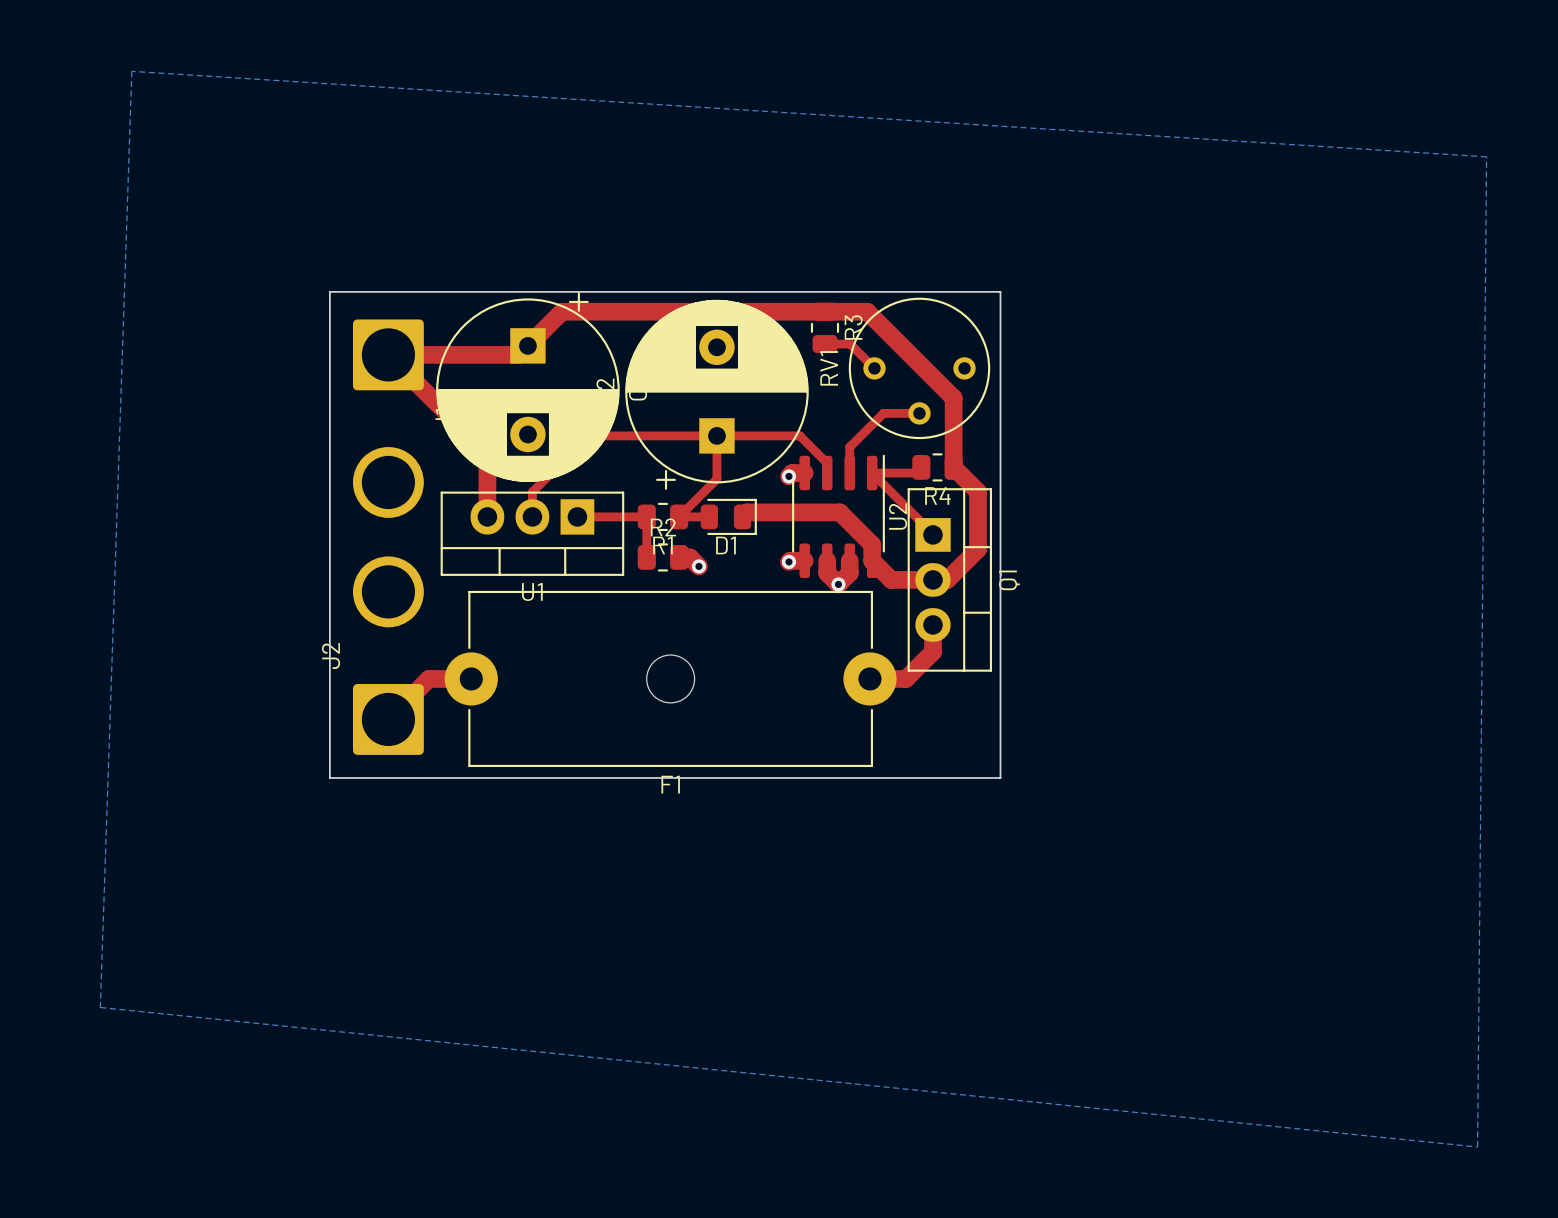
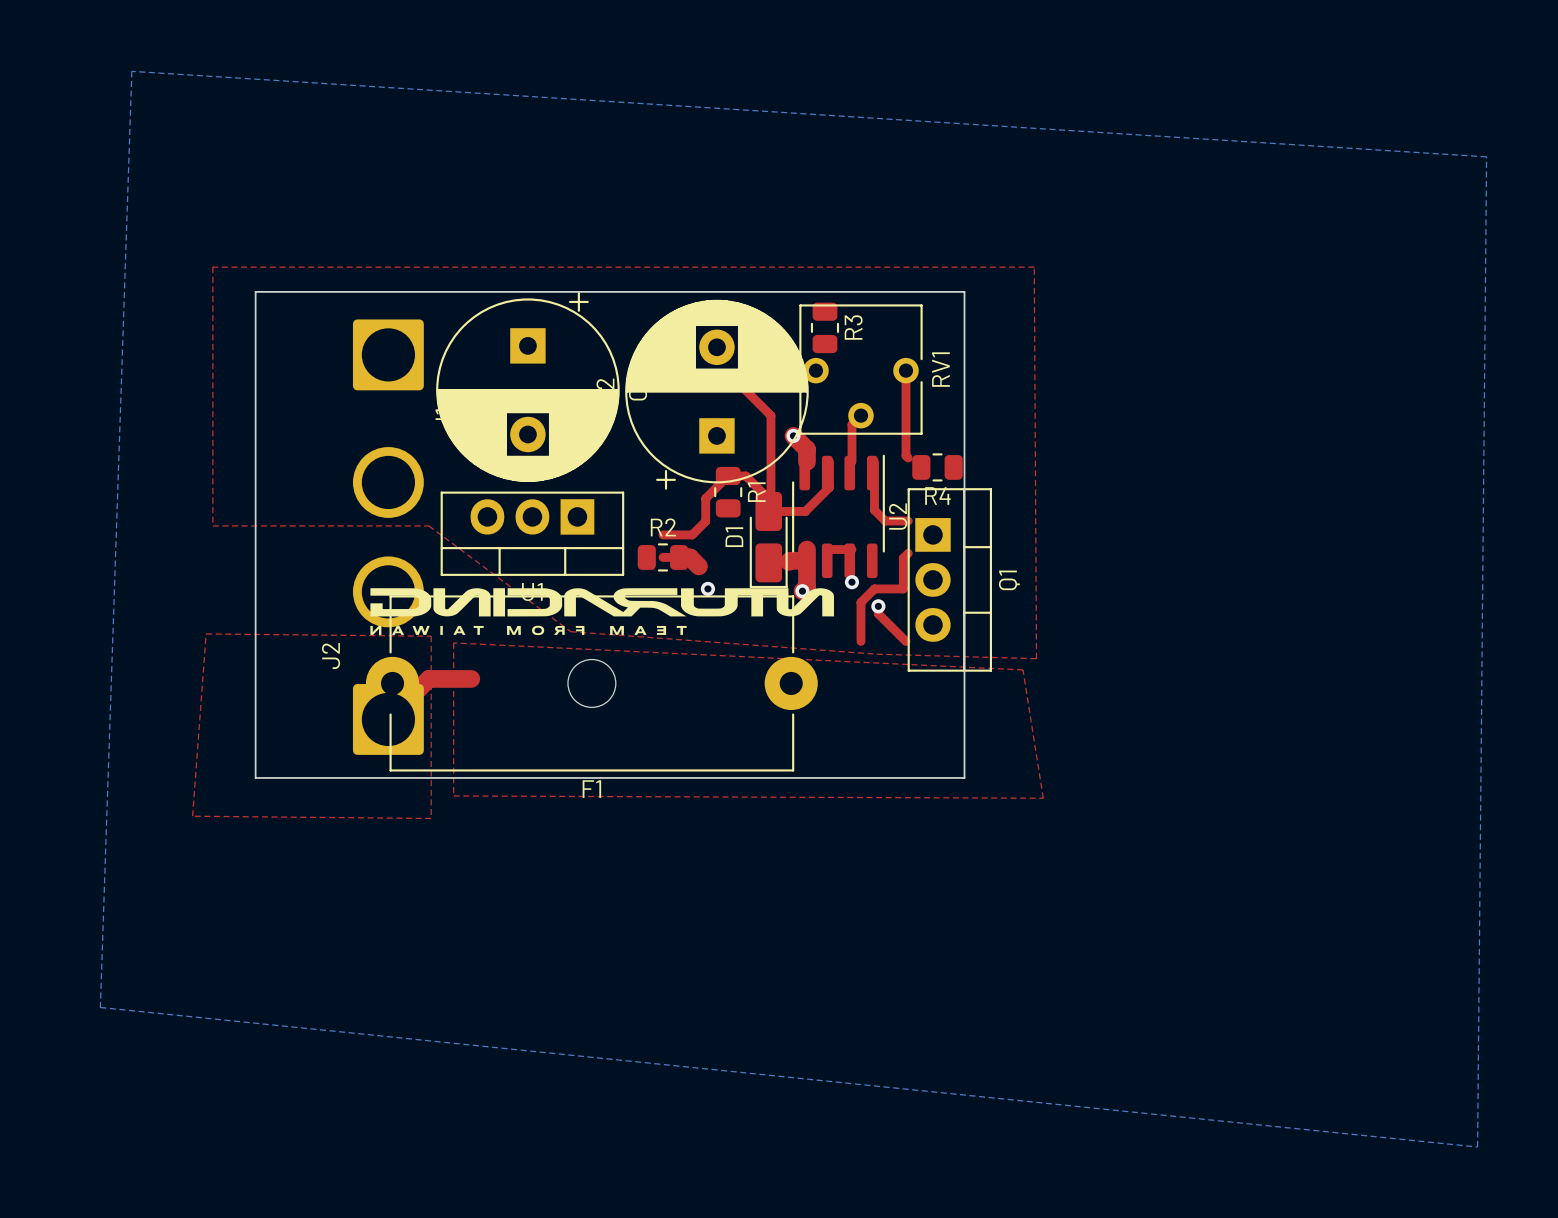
top zone outline: none -> (212, 267) (1034, 267) (1036, 658) (876, 654) (570, 631) (428, 525) (212, 525) (212, 267)
board edge: (329, 291) (329, 777) -> (329, 291) (255, 291) (255, 777) (329, 777)
board edge: (964, 291) (1000, 291) (1000, 777) (964, 777) -> (964, 291) (964, 777)
RV1 footprint: [848, 297, 991, 440] -> [799, 304, 923, 435]
top track: (824, 344) (850, 344) (874, 368) -> none
RV1 name position: RV1 (829, 368) -> RV1 (940, 369)
top track: none -> (905, 370) (905, 455) (908, 457)
top track: none -> (737, 381) (770, 415) (770, 509) (768, 511)
top track: (919, 413) (883, 413) (849, 447) (849, 473) -> none
top track: none -> (860, 415) (851, 424) (851, 461)
top track: (716, 435) (716, 479) (679, 516) (709, 516) -> none
top track: none -> (793, 435) (806, 449) (806, 461)
top track: none -> (829, 461) (829, 487) (805, 511) (768, 511)
top track: none -> (874, 461) (874, 510) (885, 521) (908, 521)
top track: (921, 467) (915, 473) (872, 473) (933, 534) -> none
top track: (804, 473) (792, 473) (788, 476) -> none
top track: (827, 473) (827, 463) (799, 435) (588, 435) (532, 492) (532, 516) -> none
via position: (788, 476) -> (793, 435)
D1 footprint: [700, 498, 757, 535] -> [749, 491, 788, 589]
top track: none -> (768, 511) (768, 498) (745, 476) (728, 476) (705, 498) (705, 521) (692, 534) (662, 534)
top track: (487, 516) (487, 453) (388, 354) (518, 354) (562, 311) (867, 311) (953, 398) (953, 467) (978, 491) (978, 549) (947, 579) (891, 579) (872, 560) (872, 544) (839, 512) (747, 512) (742, 516) -> none
top track: (577, 516) (646, 516) (646, 557) -> none
R1 rotation: 0° (662, 516) -> 90° clockwise (728, 492)
R1 position: (662, 516) -> (728, 492)
R1 name position: R1 (662, 545) -> R1 (756, 492)
D1 name position: D1 (725, 545) -> D1 (734, 537)
top track: none -> (806, 549) (806, 586) (802, 591)
top track: none -> (829, 549) (851, 549)
top track: none -> (908, 553) (903, 558) (903, 588) (874, 588) (860, 602) (860, 641)
top track: none -> (662, 557) (679, 557)
top track: (827, 560) (827, 573) (838, 584) (849, 573) (849, 560) -> none
via: (788, 561) -> none
via position: (698, 566) -> (707, 588)
via position: (838, 584) -> (851, 582)
drawing: none -> [370, 588, 834, 636]
via: none -> (802, 591)
top track: none -> (878, 606) (878, 613) (905, 641)
via: none -> (878, 606)
top track: (933, 624) (933, 651) (905, 678) (869, 678) -> none
top zone outline: none -> (206, 633) (431, 636) (431, 818) (192, 816) (206, 633)
top zone outline: none -> (453, 642) (1023, 669) (1043, 798) (453, 795) (453, 642)
F1 position: (670, 678) -> (591, 683)

